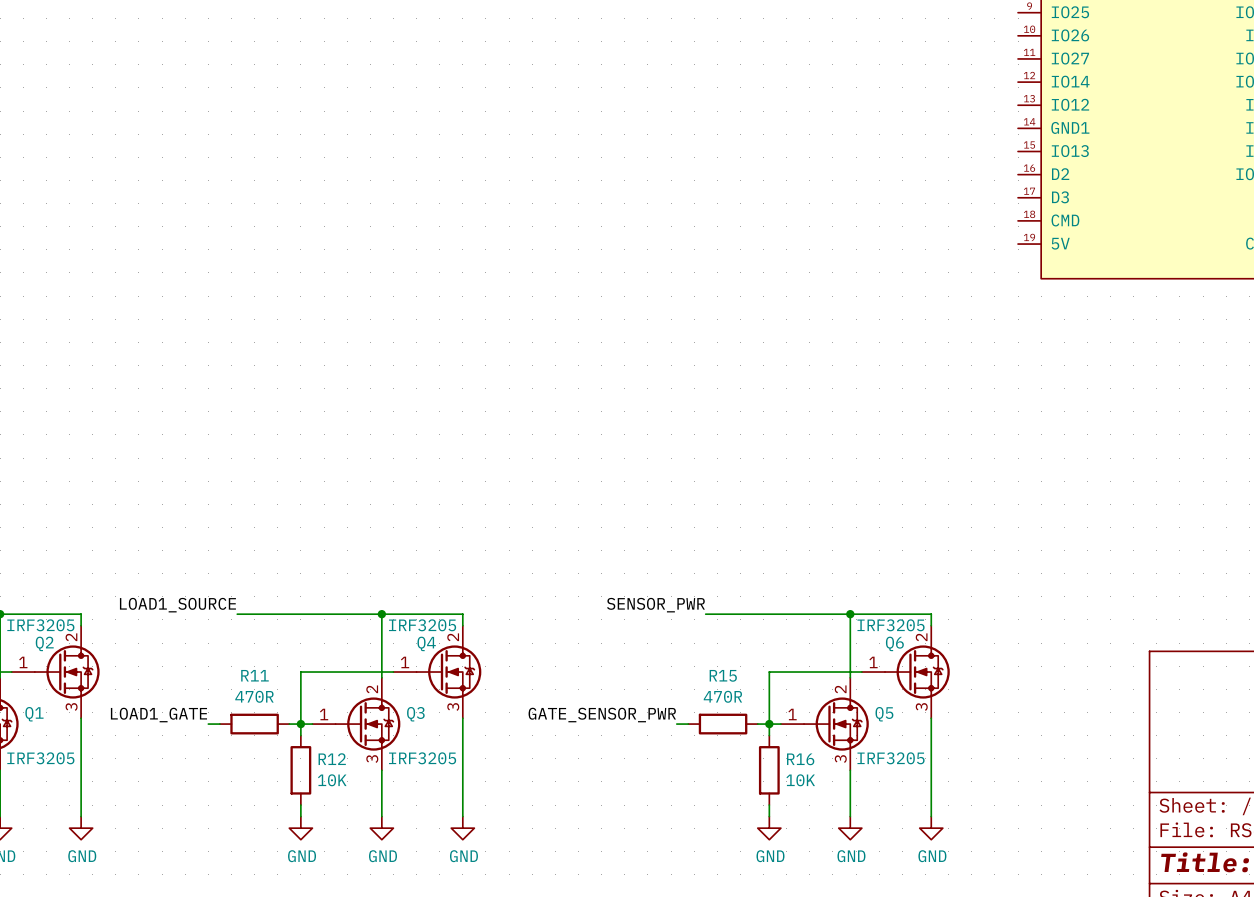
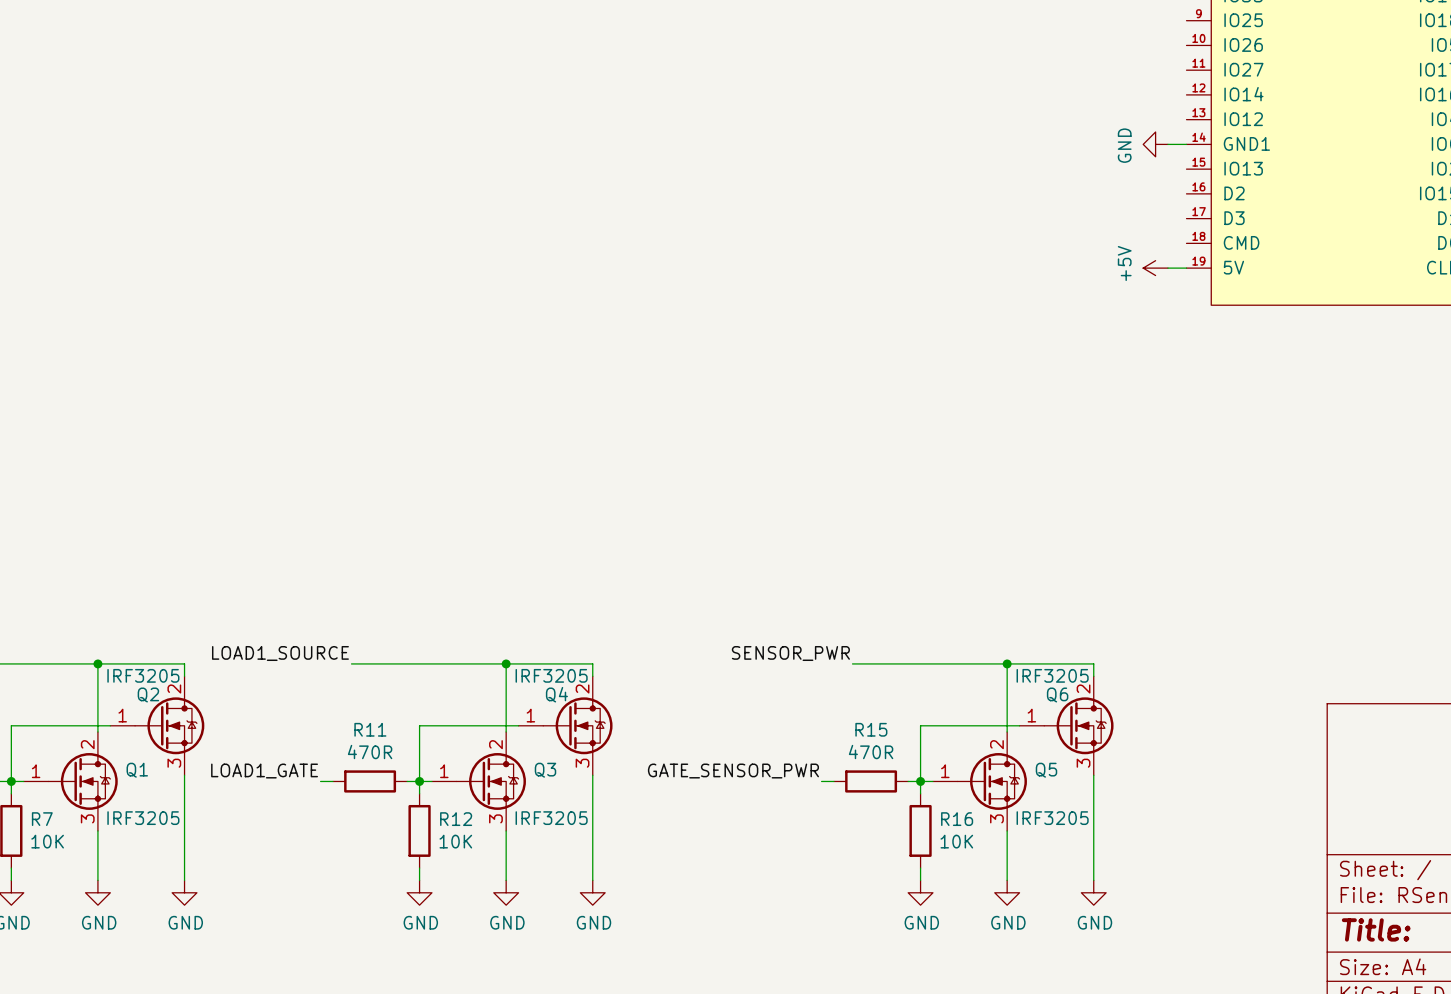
power symbol: none -> GND (1155, 144)
wire: none -> (1167, 144) (1186, 144)
power symbol: none -> +5V (1155, 268)
wire: none -> (1167, 268) (1186, 268)

